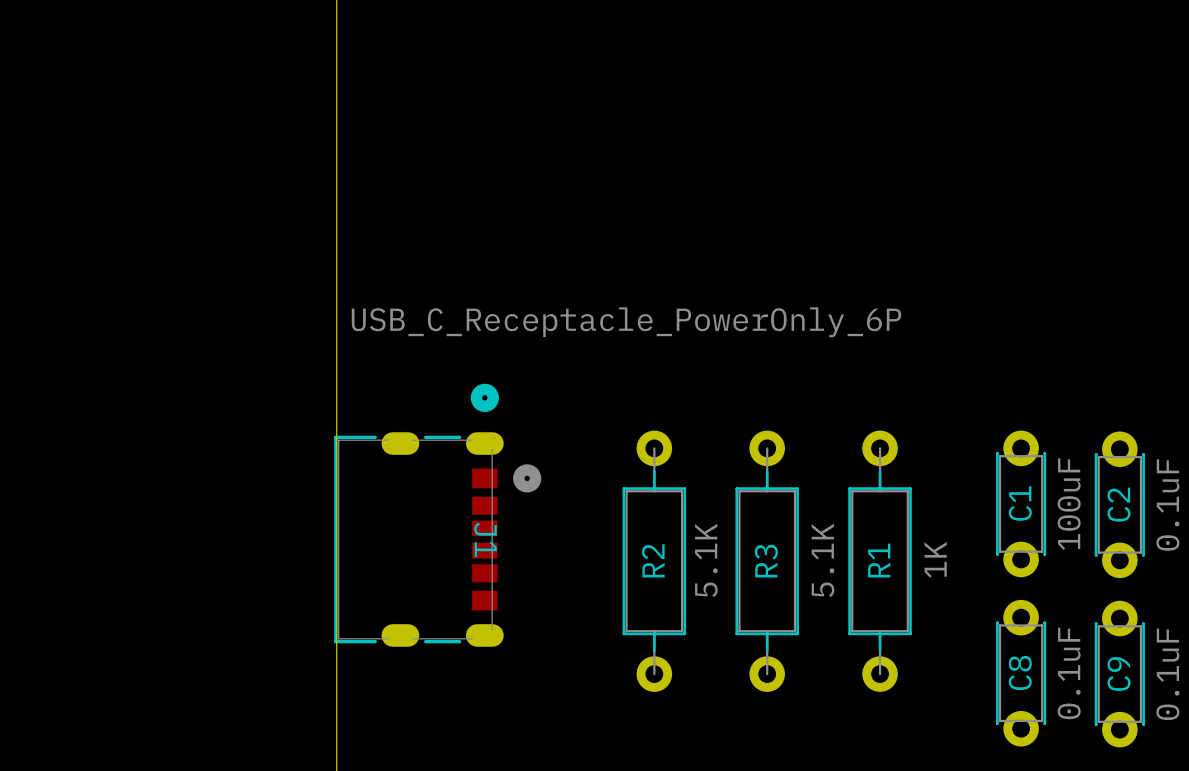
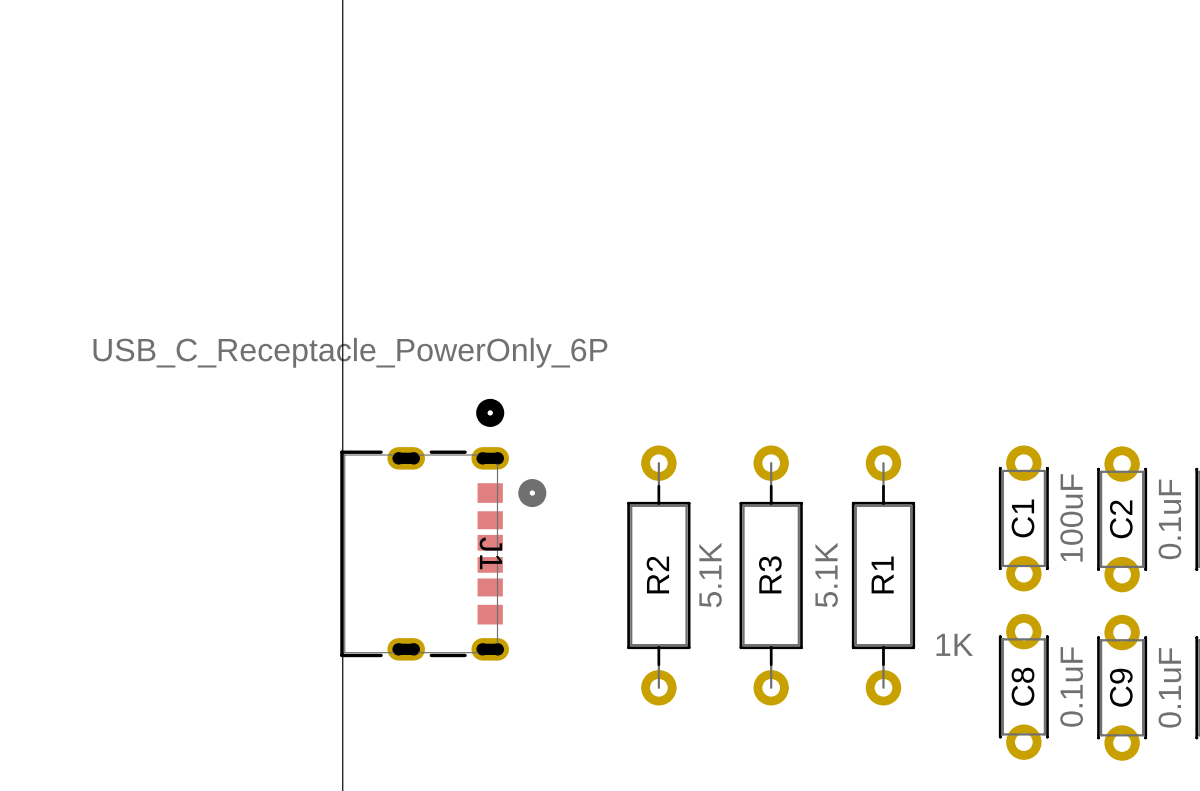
J1 value position: USB_C_Receptacle_PowerOnly_6P (626, 322) -> USB_C_Receptacle_PowerOnly_6P (350, 352)
R1 value rotation: 0° (935, 559) -> 90° clockwise (954, 644)
R1 value position: 1K (935, 559) -> 1K (954, 644)

